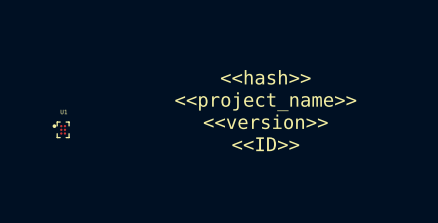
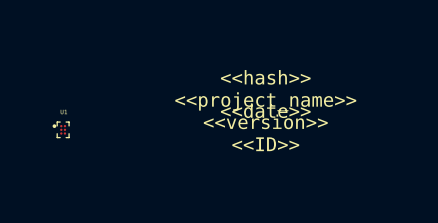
text: none -> <<date>> (265, 110)

